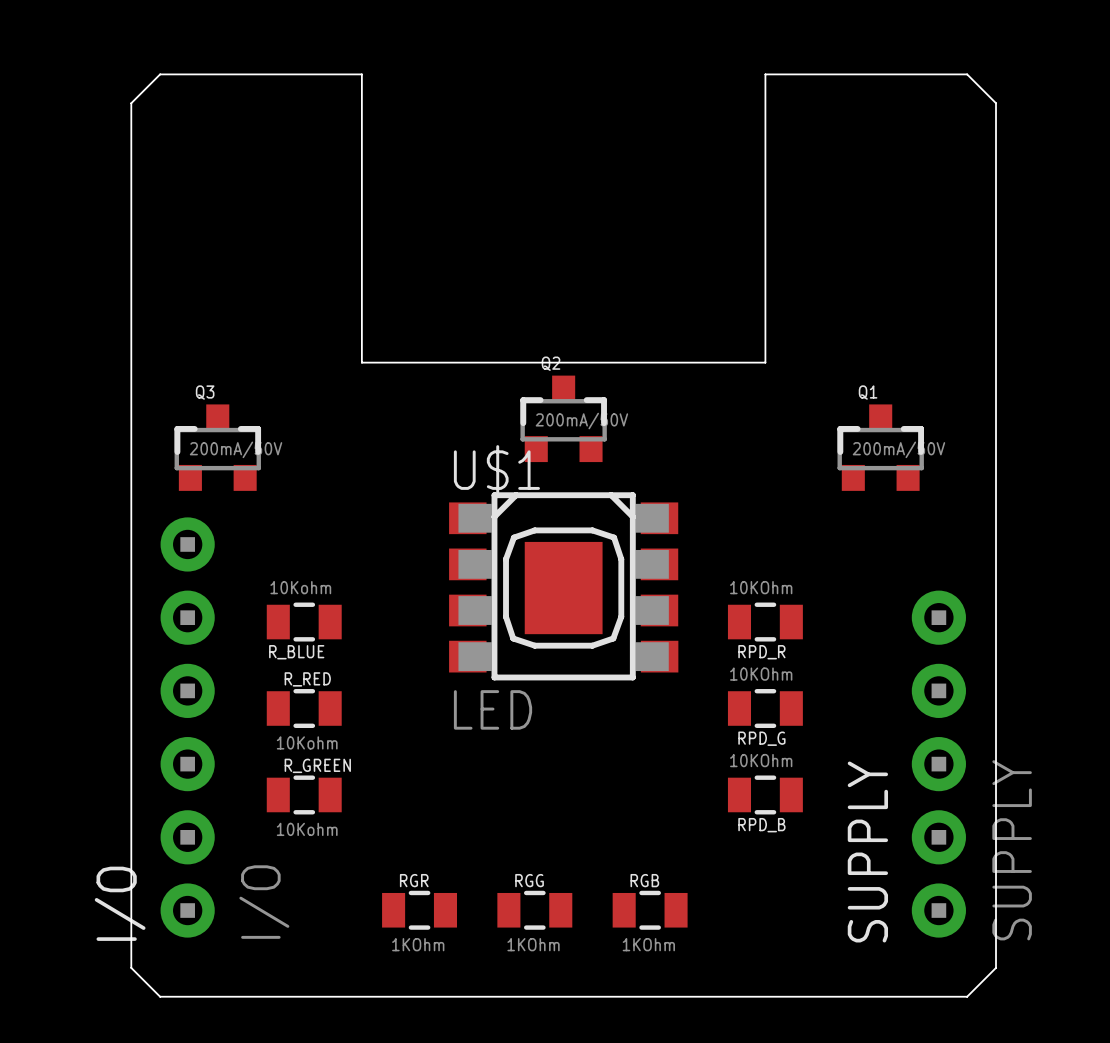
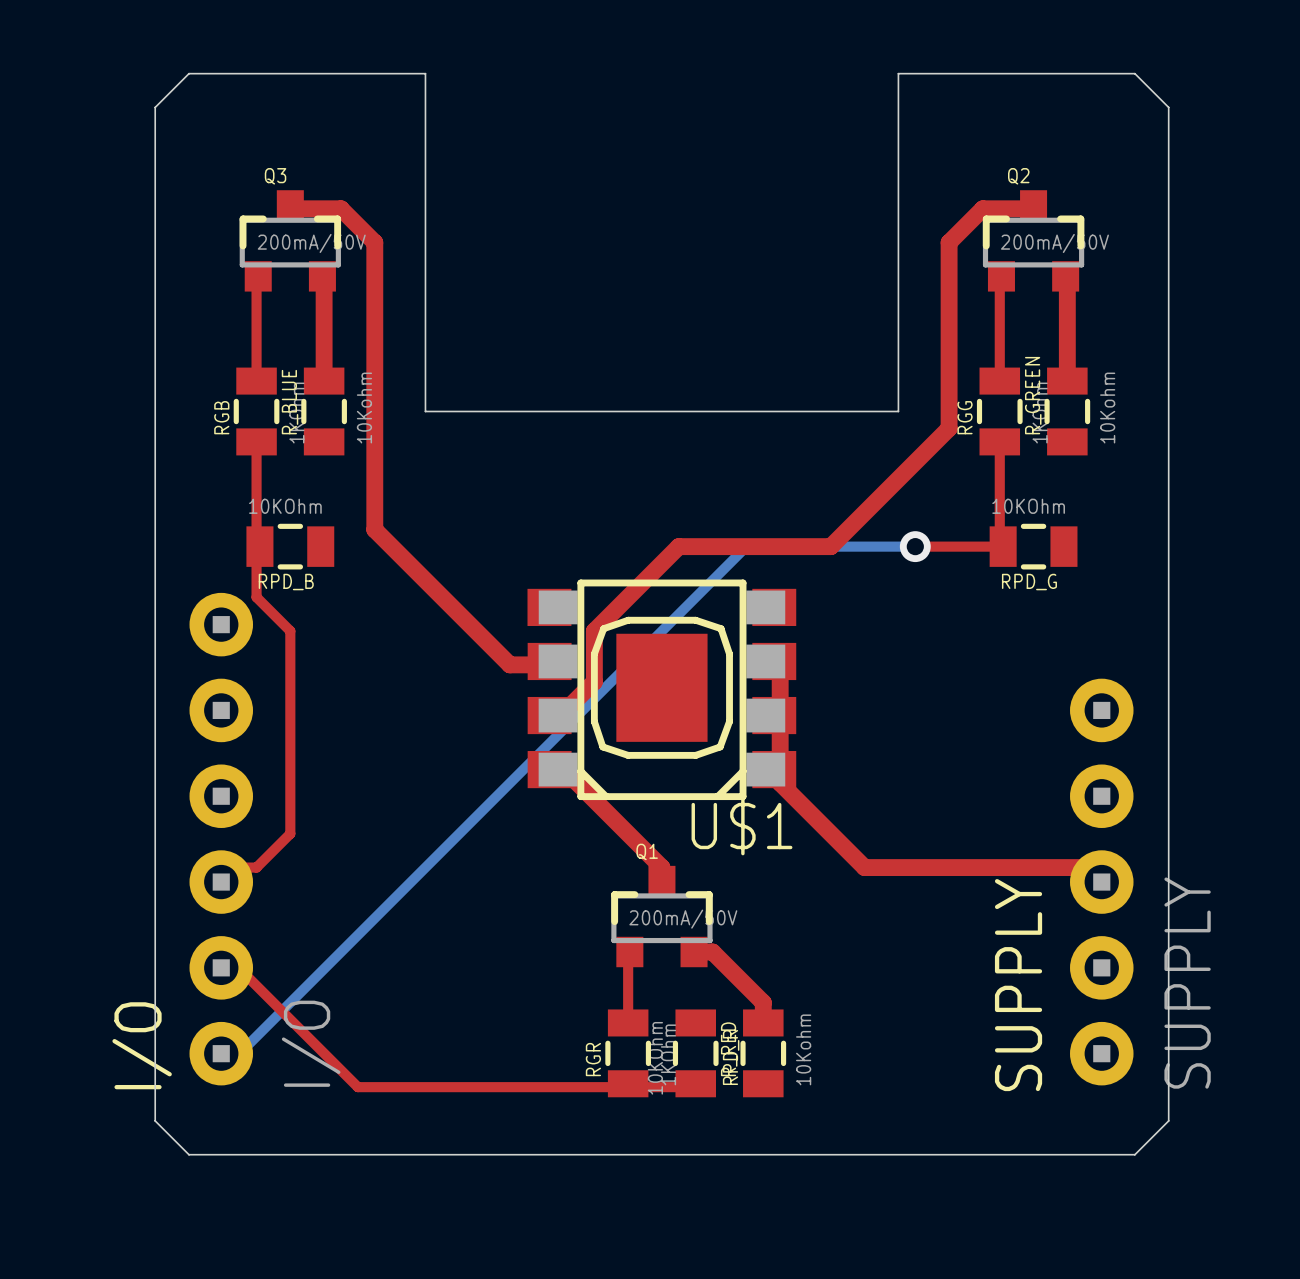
top track: none -> (290, 205) (290, 208) (341, 208) (374, 242) (374, 529) (509, 664) (543, 664) (549, 661)
top track: none -> (1033, 205) (1033, 208) (982, 208) (949, 242) (949, 428) (830, 546) (678, 546) (594, 631) (594, 681) (560, 715) (549, 715)
top track: none -> (258, 276) (256, 276) (256, 381)
top track: none -> (322, 276) (324, 276) (324, 381)
top track: none -> (1001, 276) (999, 276) (999, 381)
top track: none -> (1065, 276) (1067, 276) (1067, 381)
R_GREEN: none -> 10Kohm (1067, 411)
top track: none -> (256, 441) (256, 597) (290, 631) (290, 833) (256, 867) (222, 867) (221, 882)
top track: none -> (999, 441) (999, 546)
Q2 position: (563, 418) -> (1033, 240)
Q3 position: (217, 447) -> (290, 240)
Q1 position: (880, 447) -> (661, 916)
top track: none -> (915, 546) (1003, 546)
bottom track: none -> (915, 546) (746, 546) (222, 1070) (221, 1053)
via: none -> (915, 546)
top track: none -> (774, 661) (780, 664) (780, 766) (774, 769) (780, 783) (864, 867) (1101, 867) (1101, 882)
U$1 rotation: 0° (563, 586) -> 180° (661, 689)
R_BLUE rotation: 0° (304, 622) -> 90° clockwise (324, 411)
R_BLUE position: (304, 622) -> (324, 411)
RPD_R rotation: 0° (765, 622) -> 90° clockwise (695, 1053)
RPD_R position: (765, 622) -> (695, 1053)
top track: none -> (549, 769) (560, 766) (661, 867) (661, 881)
R_RED rotation: 0° (304, 708) -> 90° clockwise (763, 1053)
R_RED position: (304, 708) -> (763, 1053)
RPD_G position: (765, 708) -> (1033, 546)
U$1 value: LED (493, 709) -> none
R_GREEN: 10Kohm (304, 794) -> none
RPD_B position: (765, 794) -> (290, 546)
top track: none -> (629, 952) (628, 952) (628, 1022)
top track: none -> (694, 952) (712, 952) (763, 1002) (763, 1022)
top track: none -> (221, 967) (222, 952) (357, 1087) (695, 1087) (695, 1083)
RGR rotation: 0° (419, 910) -> 90° clockwise (628, 1053)
RGR position: (419, 910) -> (628, 1053)
RGG rotation: 0° (534, 910) -> 90° clockwise (999, 411)
RGG position: (534, 910) -> (999, 411)
RGB rotation: 0° (650, 910) -> 90° clockwise (256, 411)
RGB position: (650, 910) -> (256, 411)

